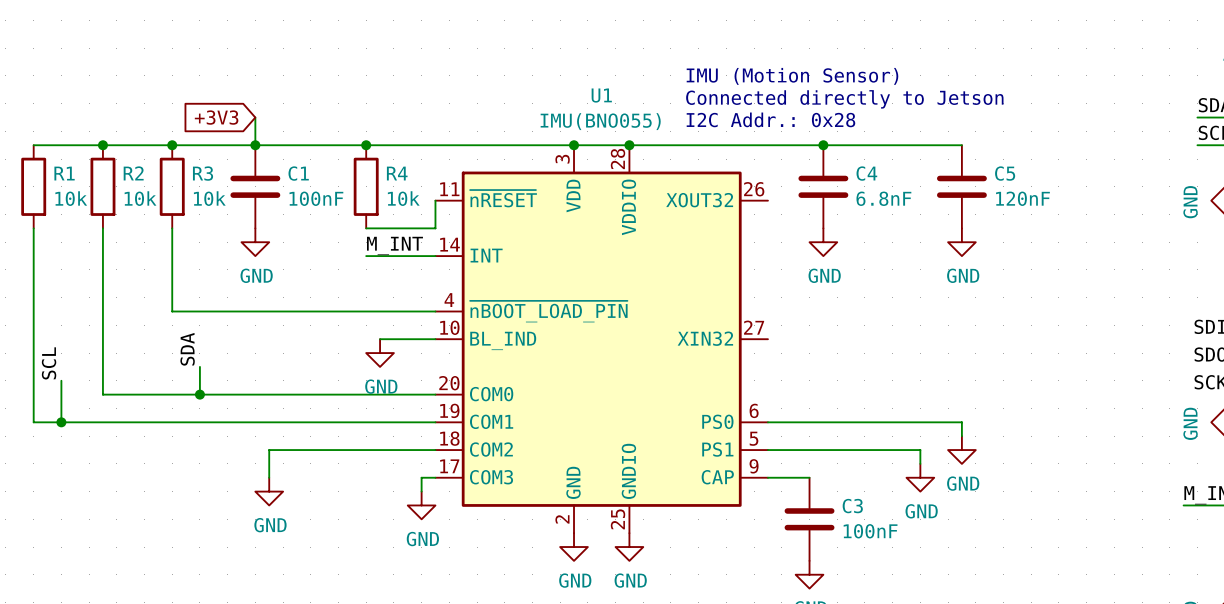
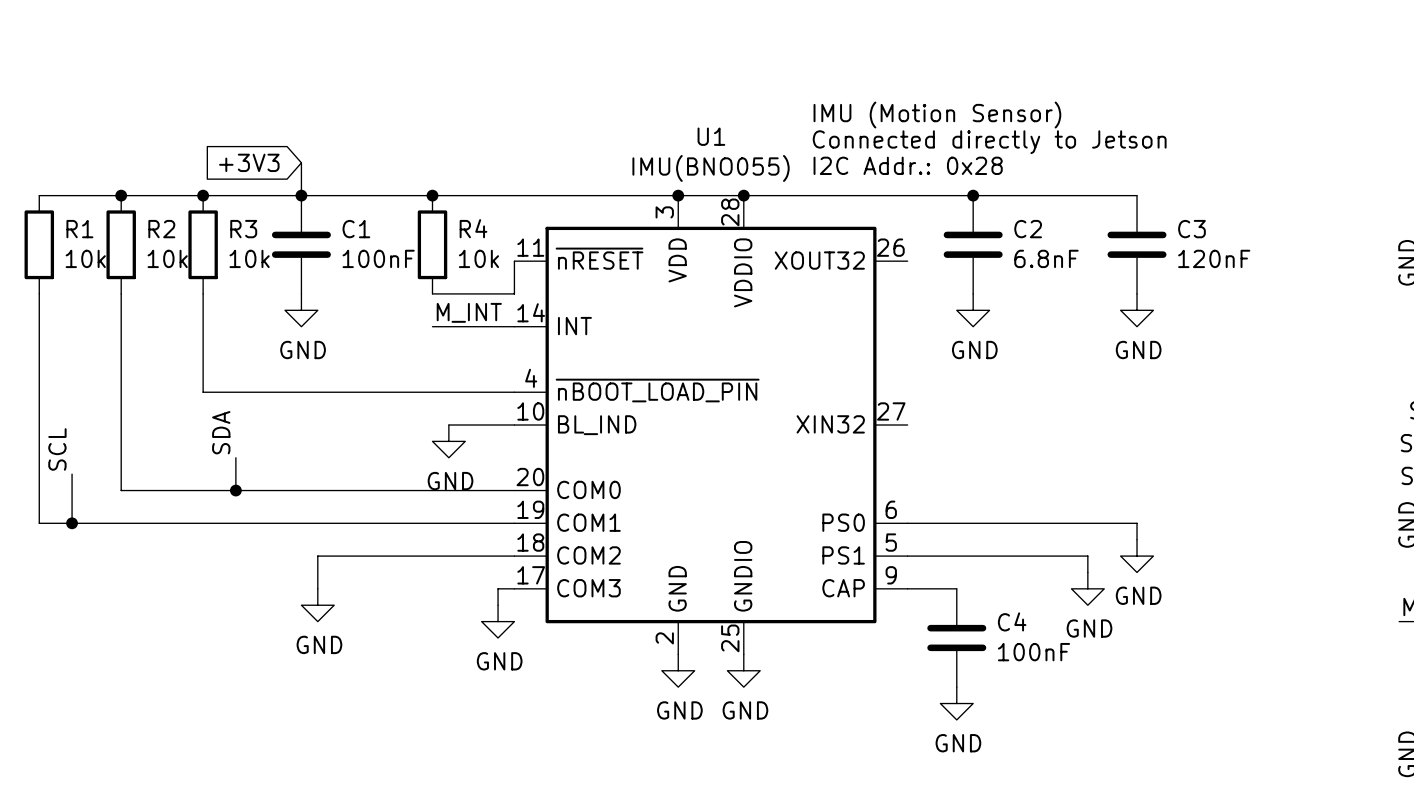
C4 name: C4 (866, 173) -> C2 (1028, 229)
C5 name: C5 (1005, 173) -> C3 (1191, 229)
C3 name: C3 (852, 506) -> C4 (1012, 621)

